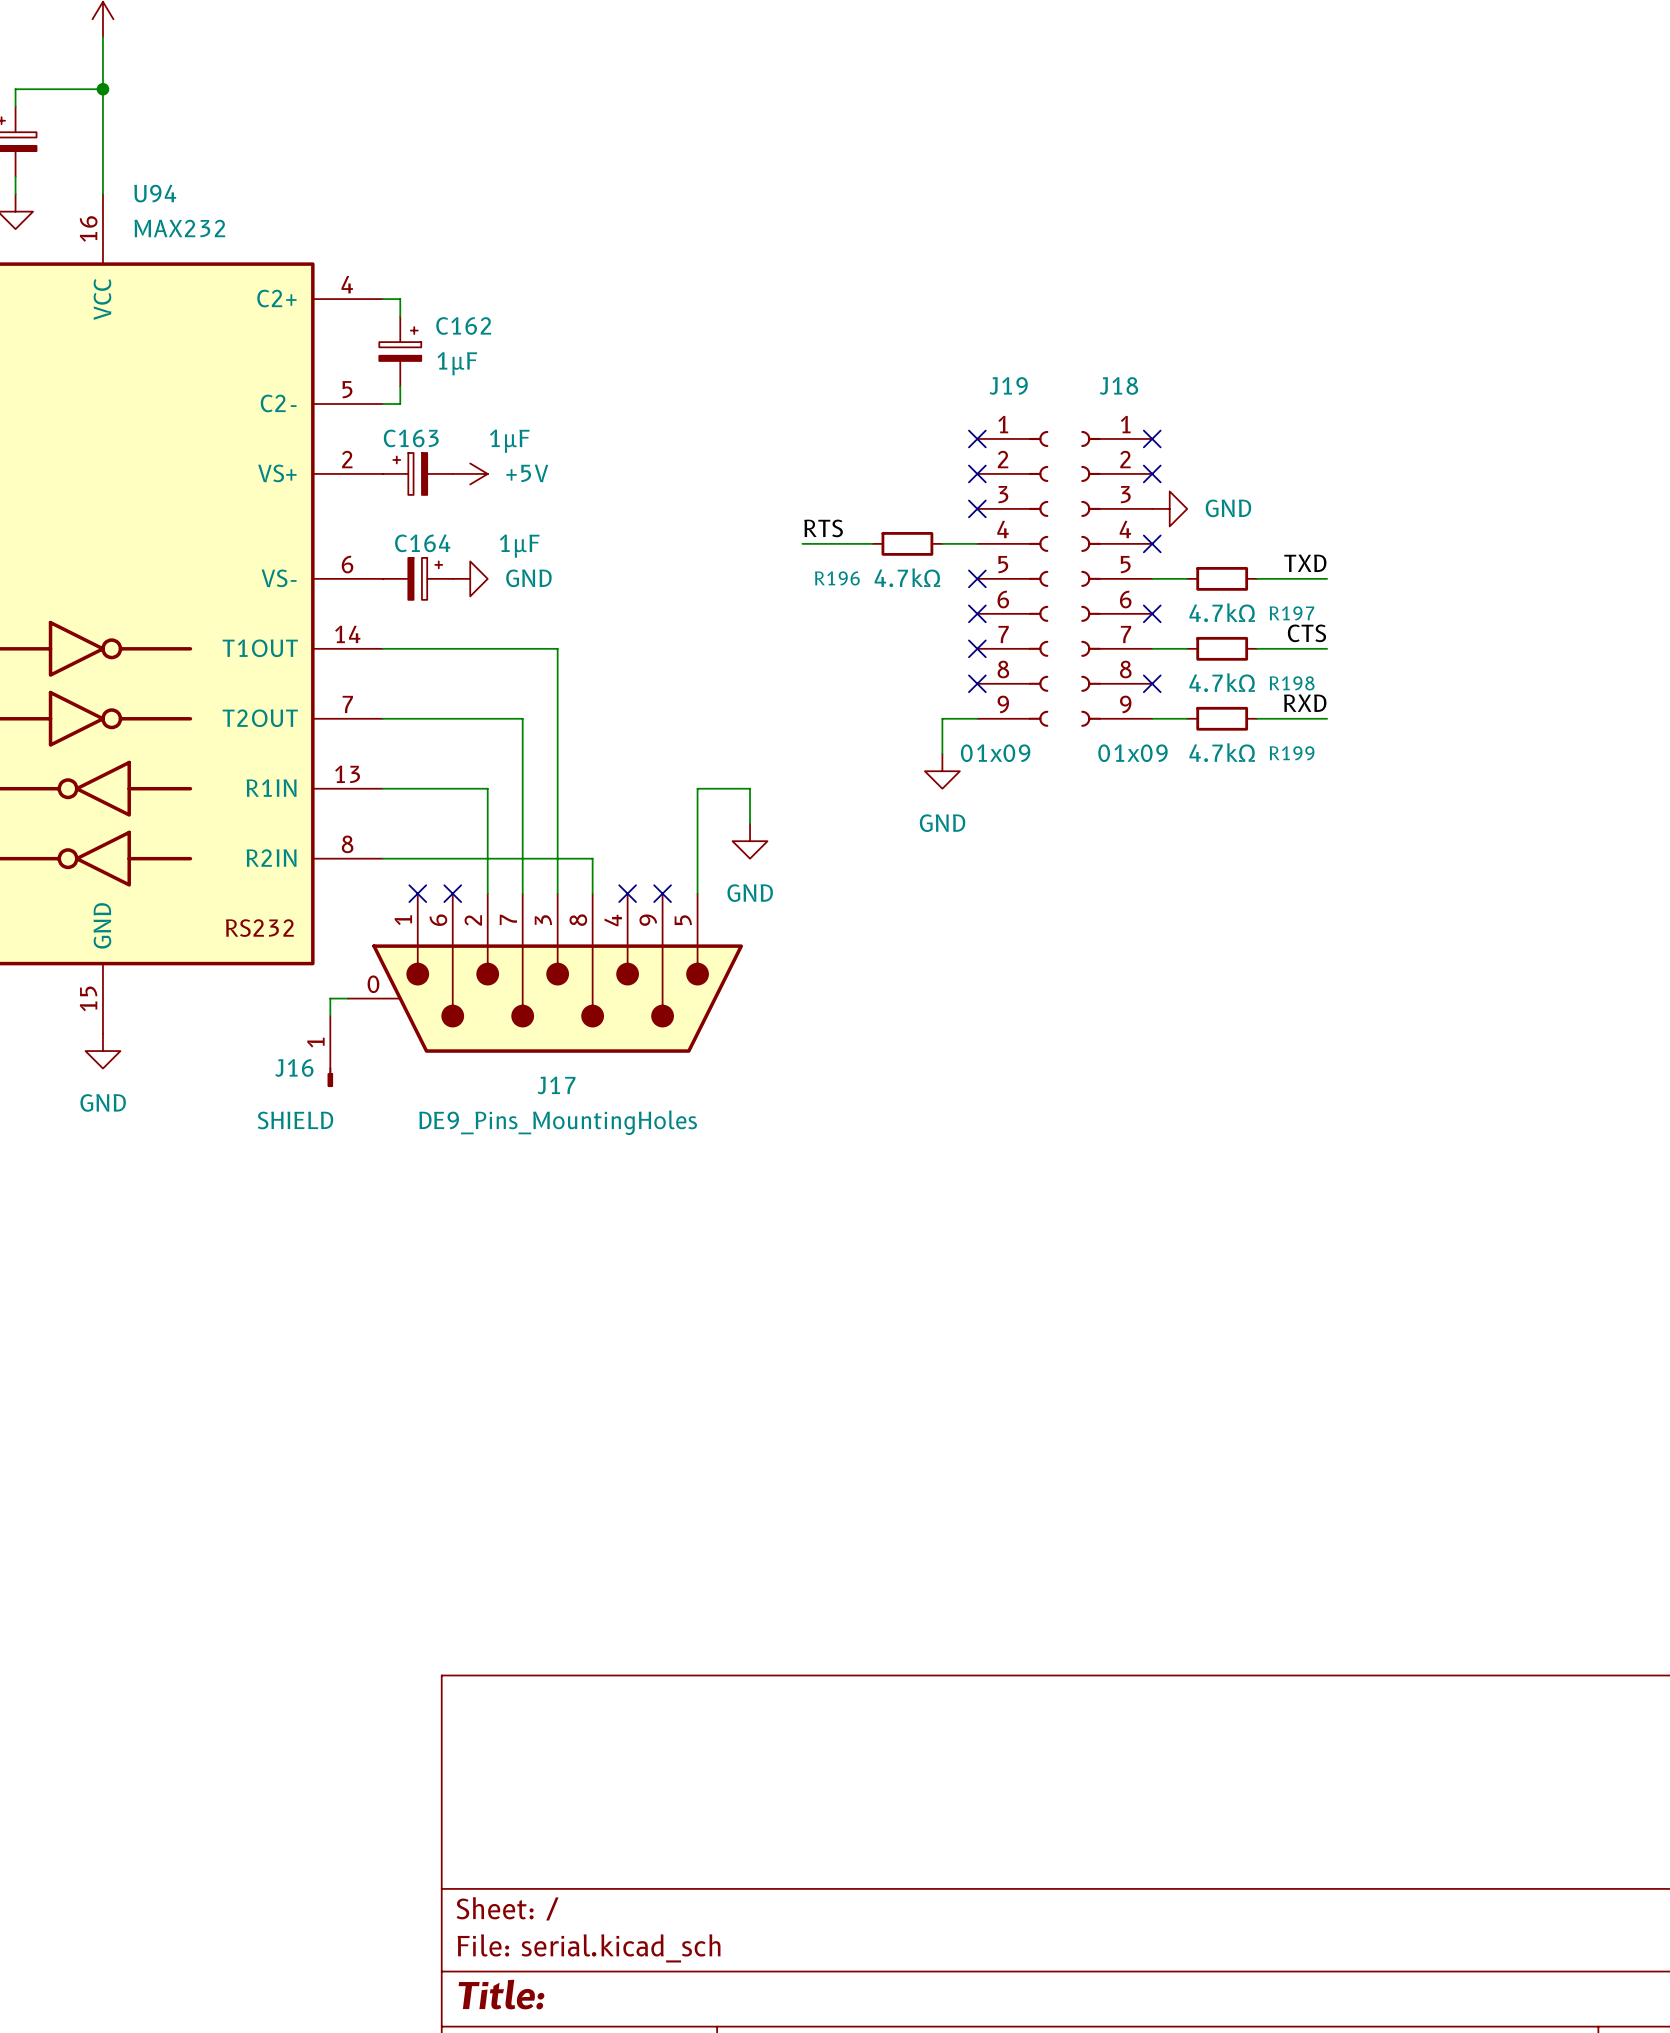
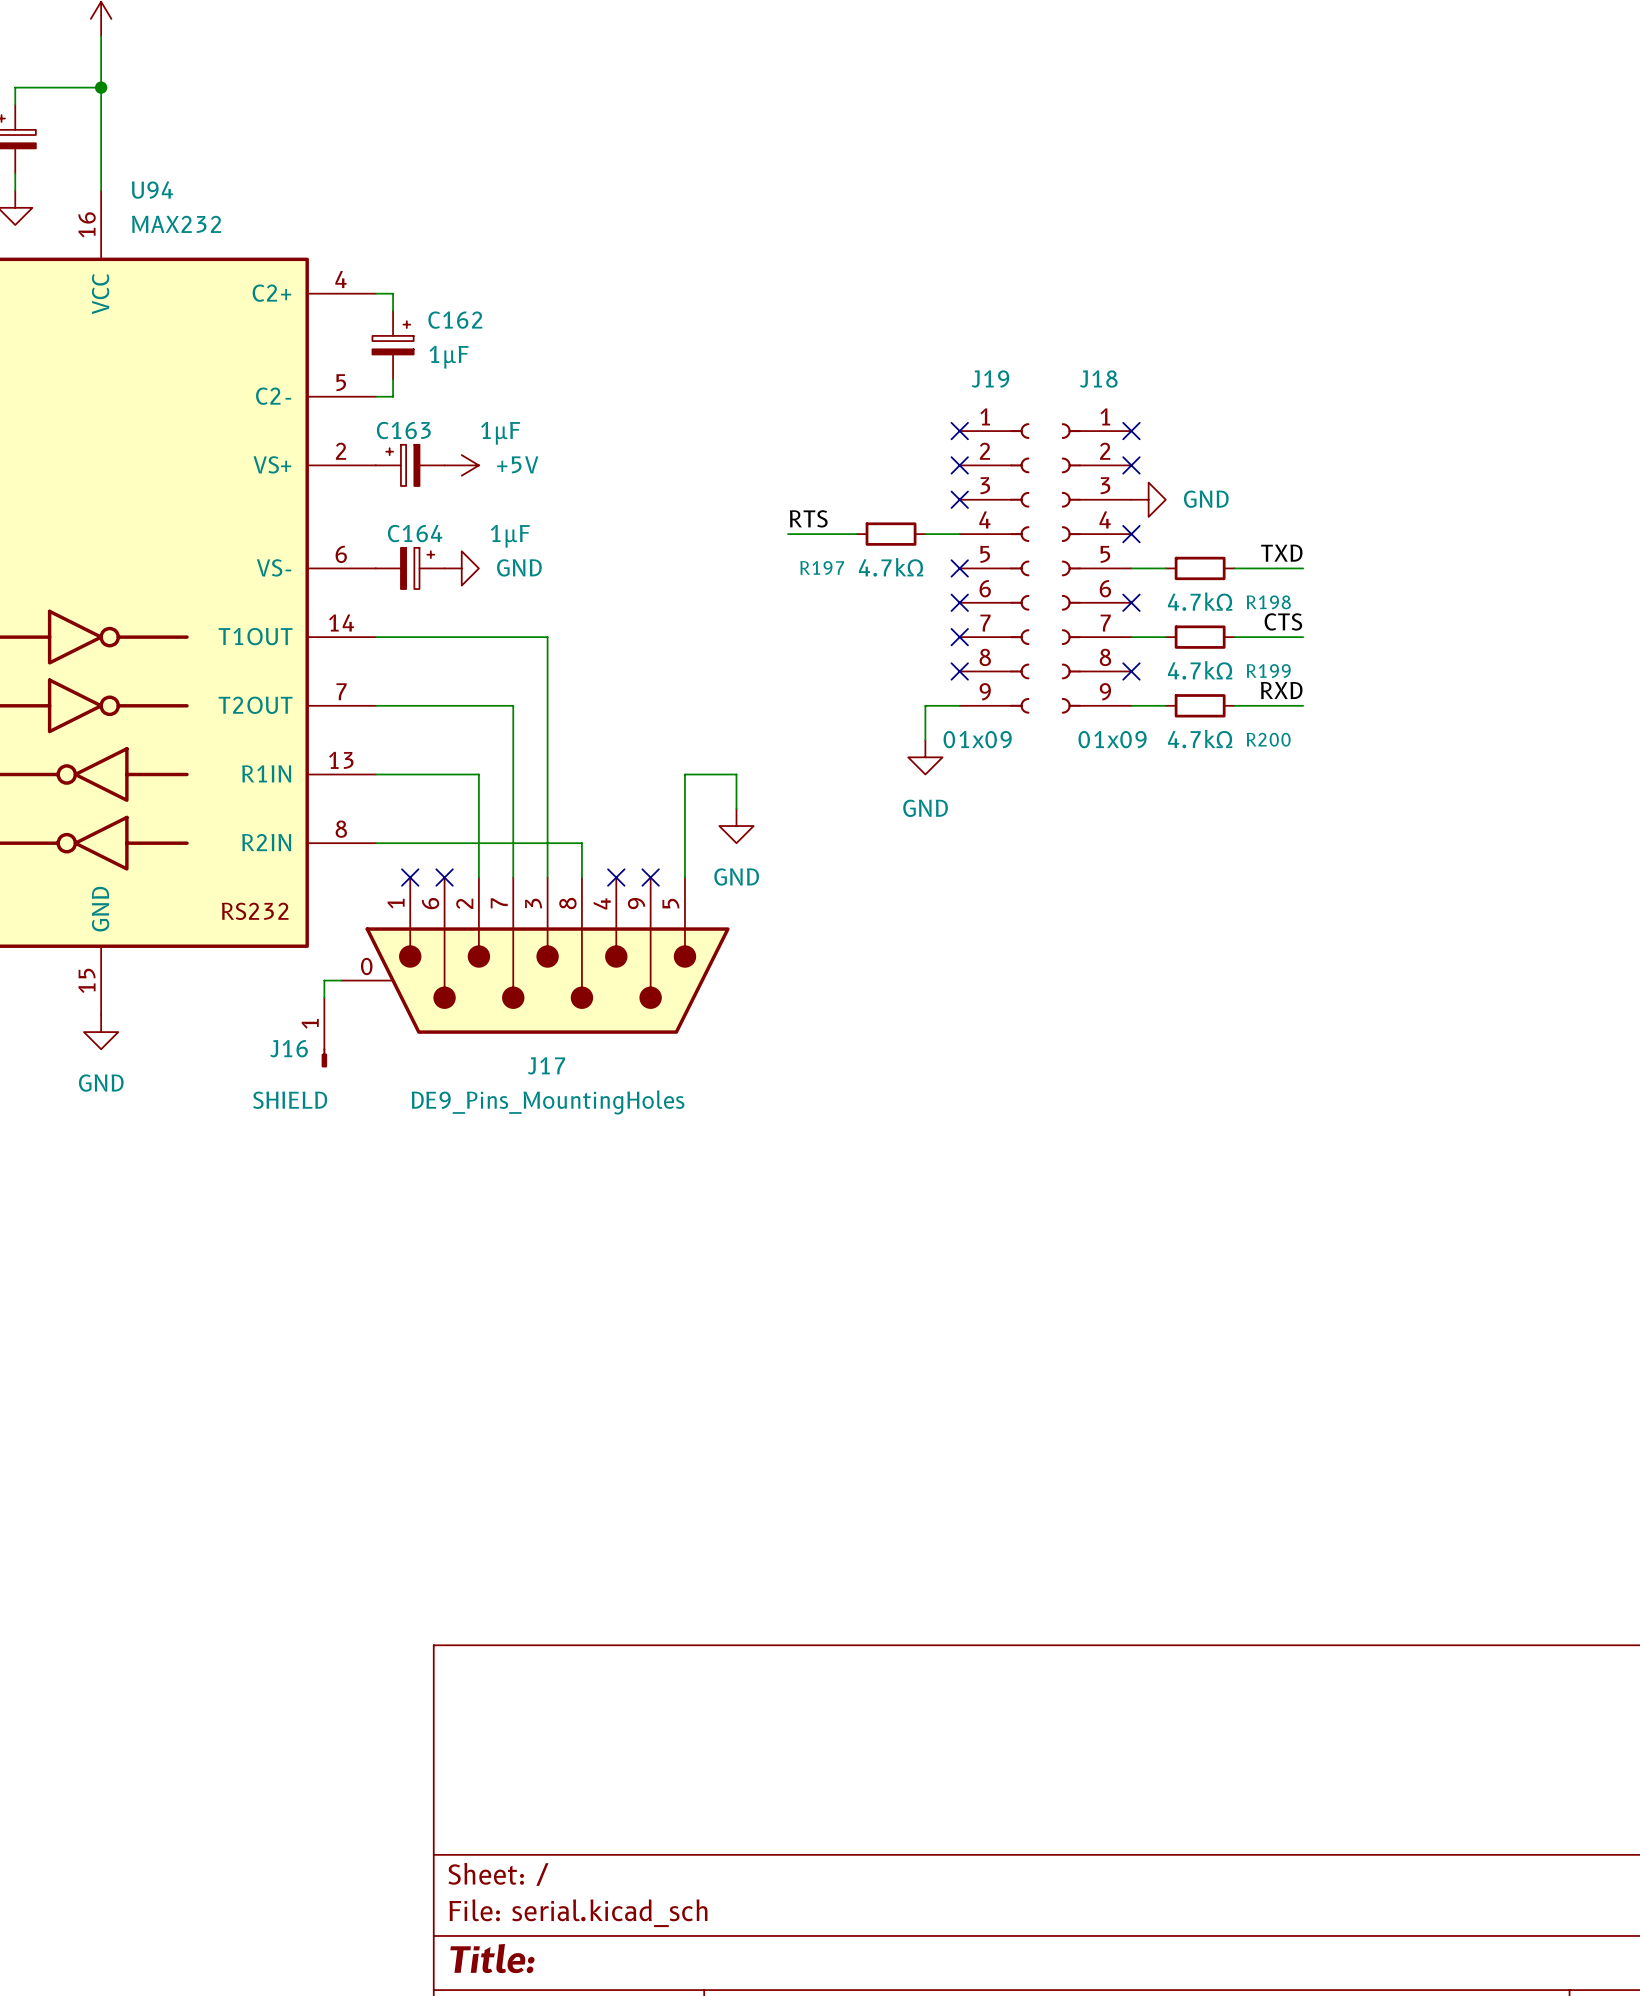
R196 name: R196 (837, 578) -> R197 (822, 568)
R197 name: R197 (1291, 613) -> R198 (1268, 602)
R198 name: R198 (1292, 683) -> R199 (1268, 671)
R199 name: R199 (1292, 753) -> R200 (1268, 739)

